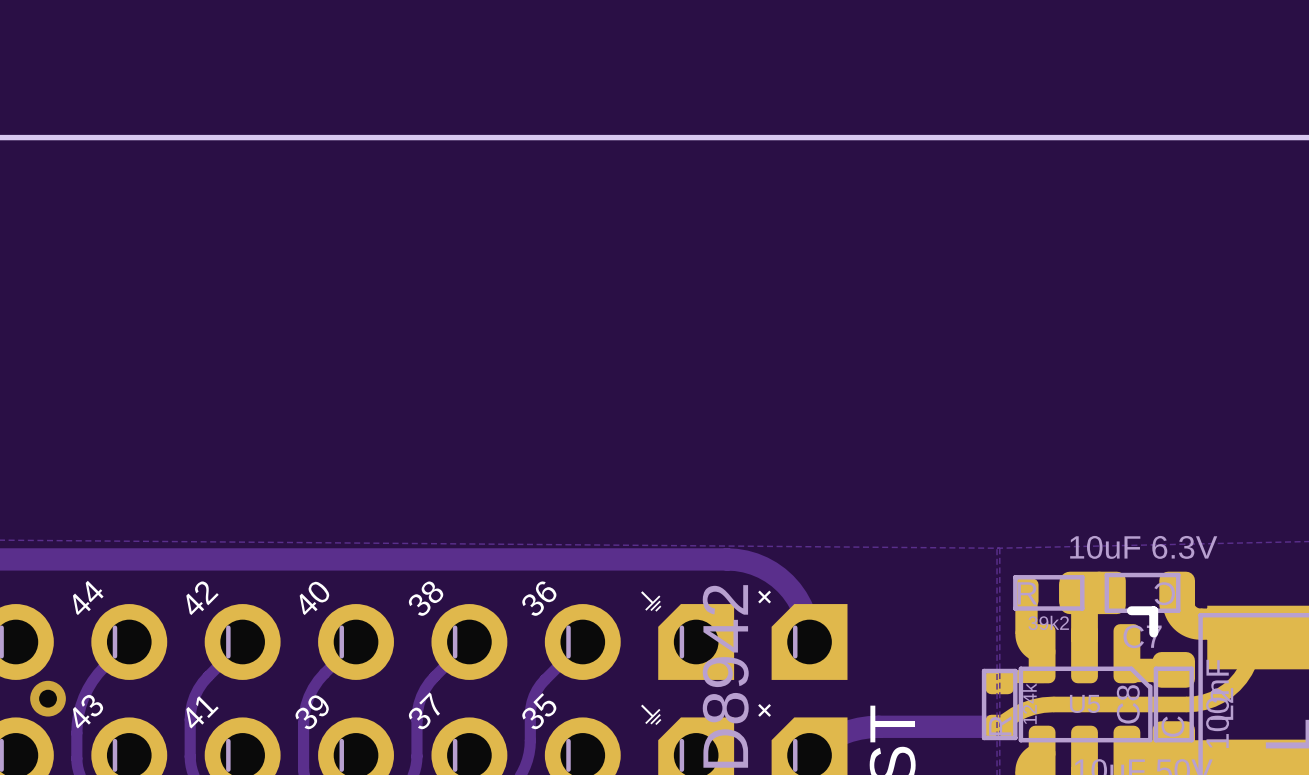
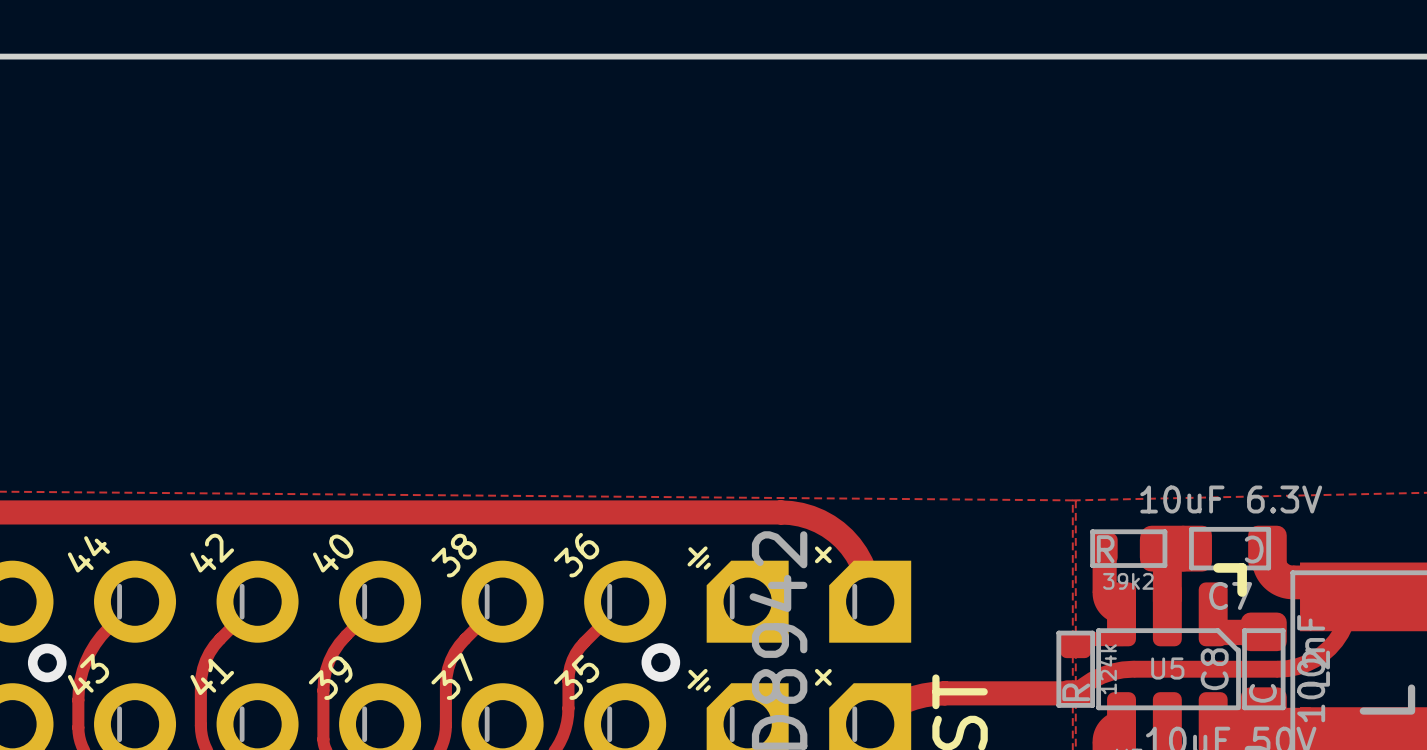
via: none -> (660, 662)

